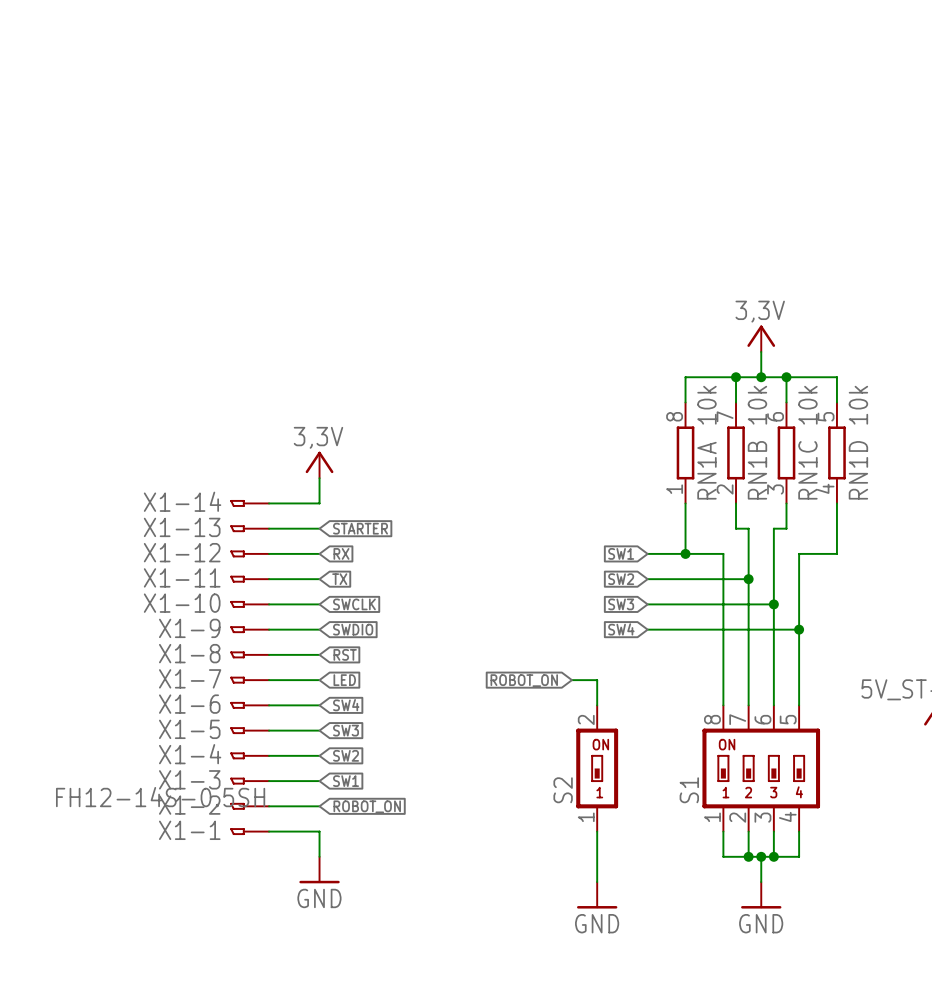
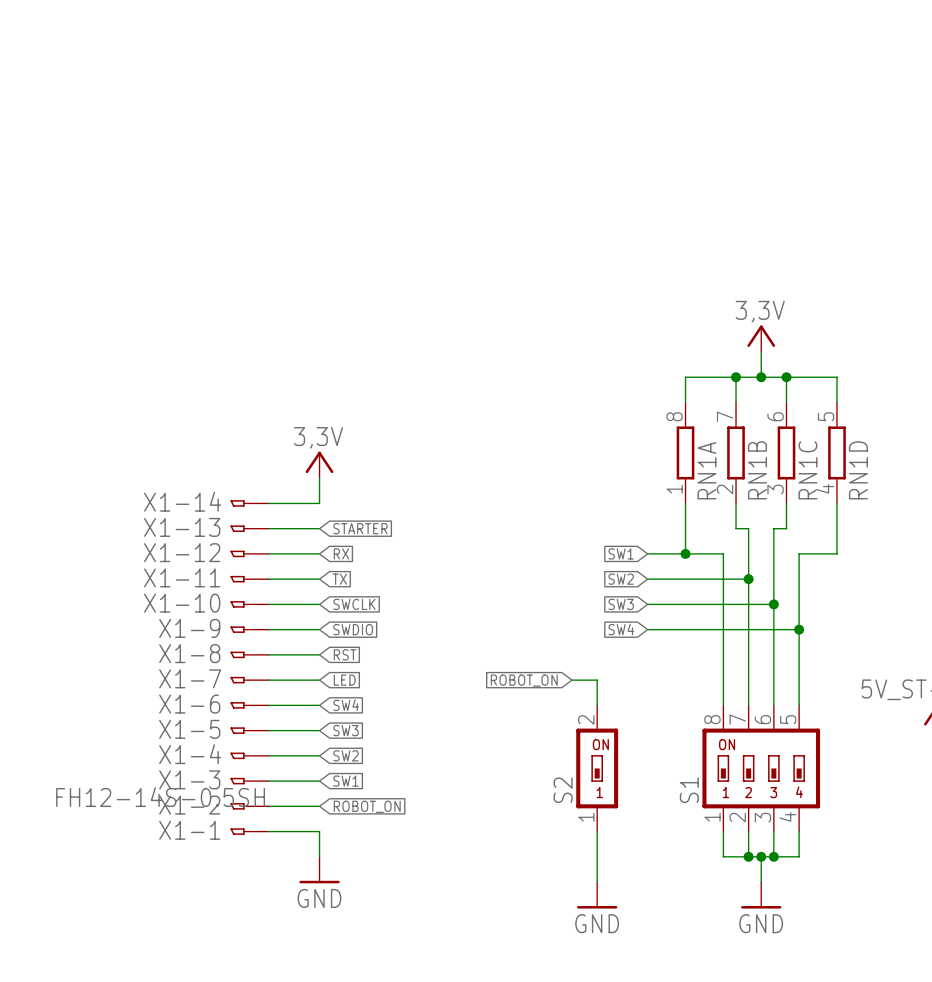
RN1A value: 10k (706, 405) -> none
RN1B value: 10k (757, 405) -> none
RN1C value: 10k (807, 405) -> none
RN1D value: 10k (858, 405) -> none

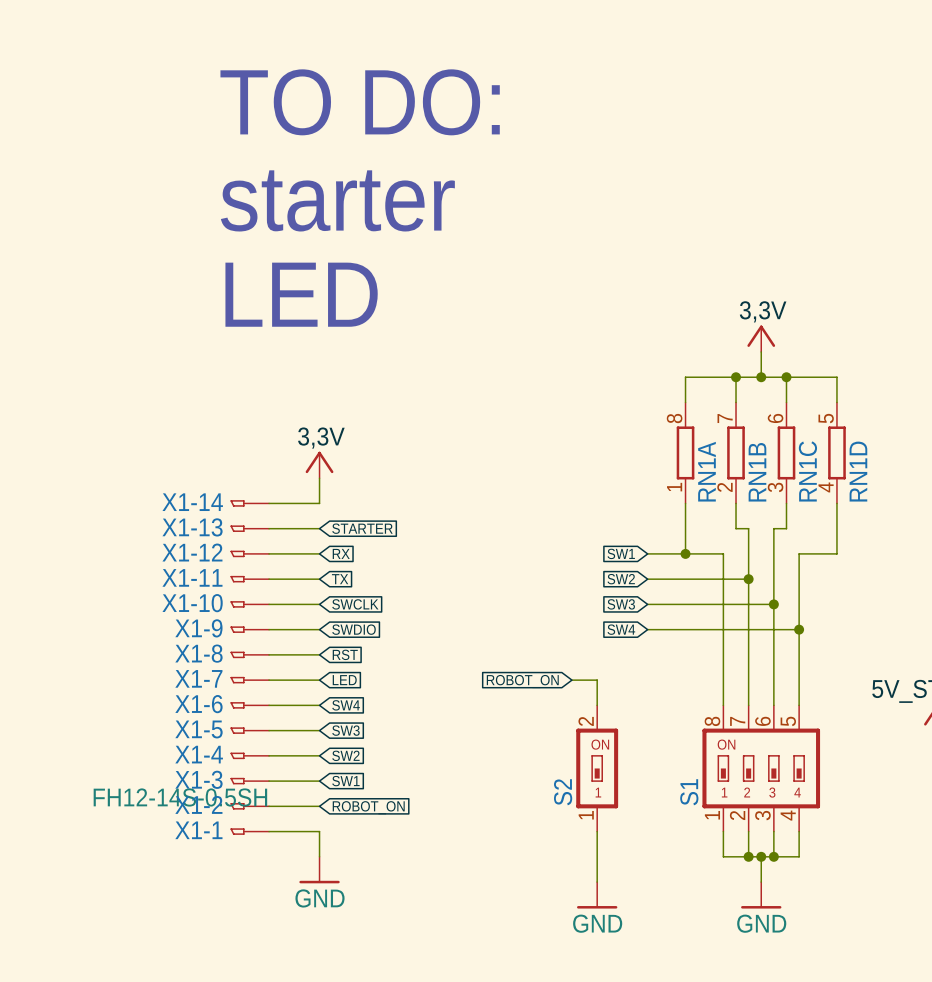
text: none -> TO DO: (360, 102)
text: none -> starter (337, 200)
text: none -> LED (301, 294)

